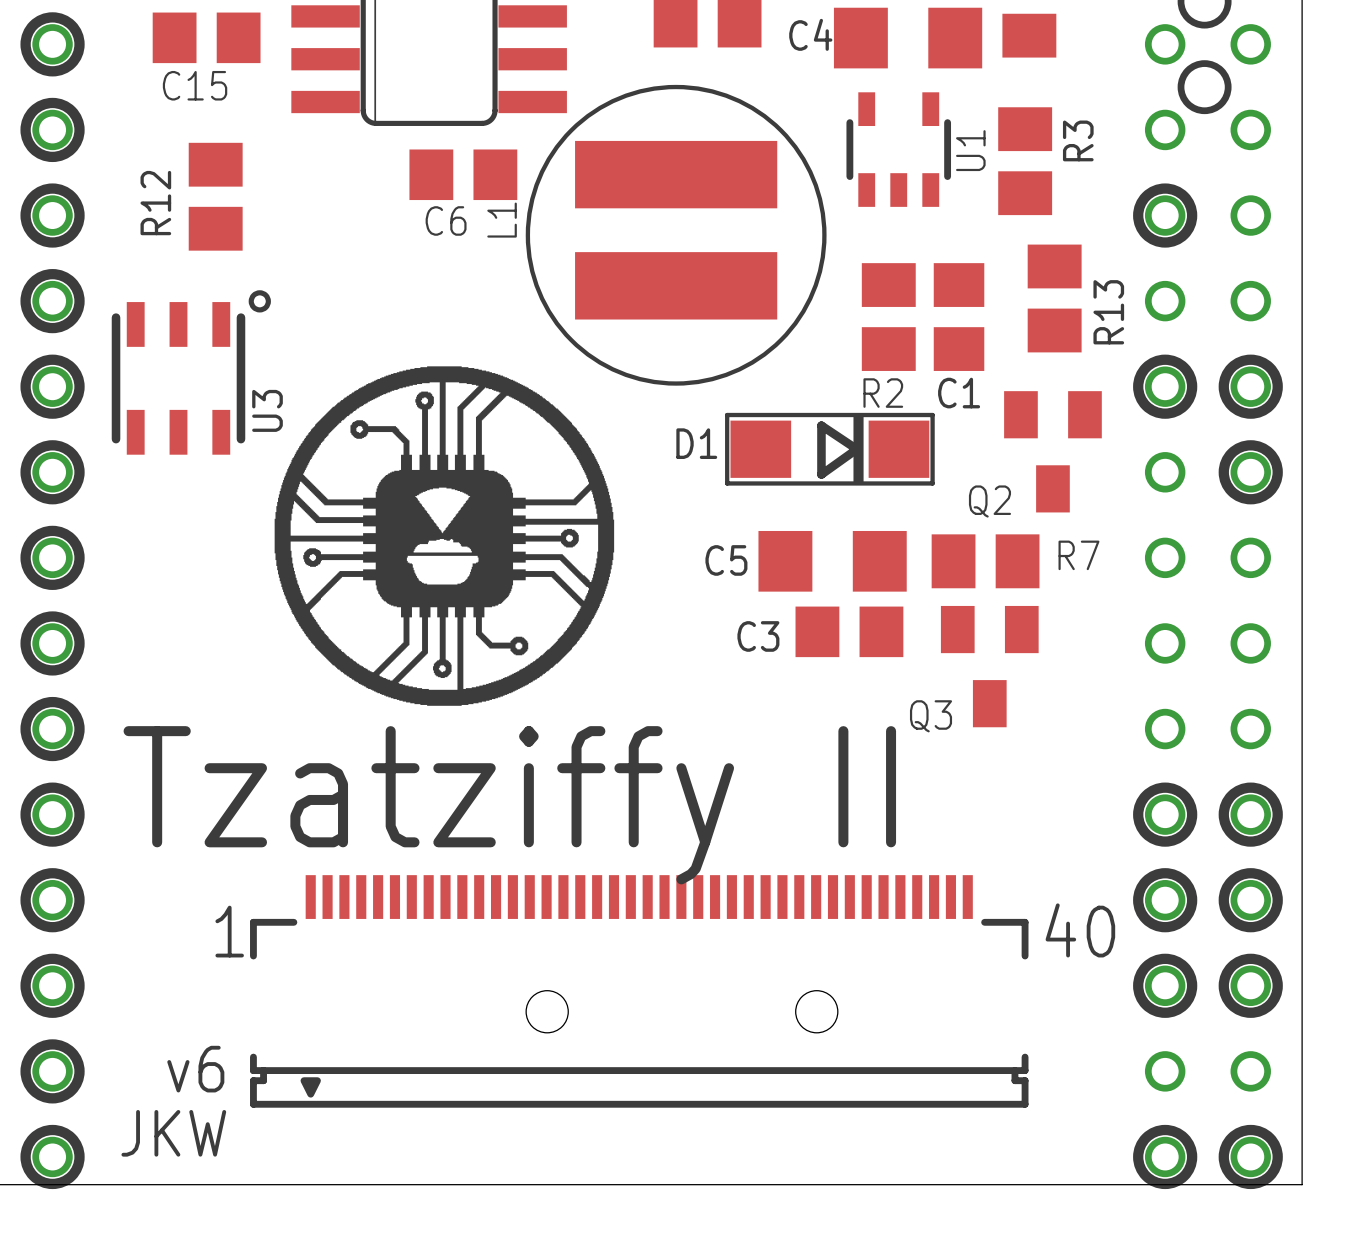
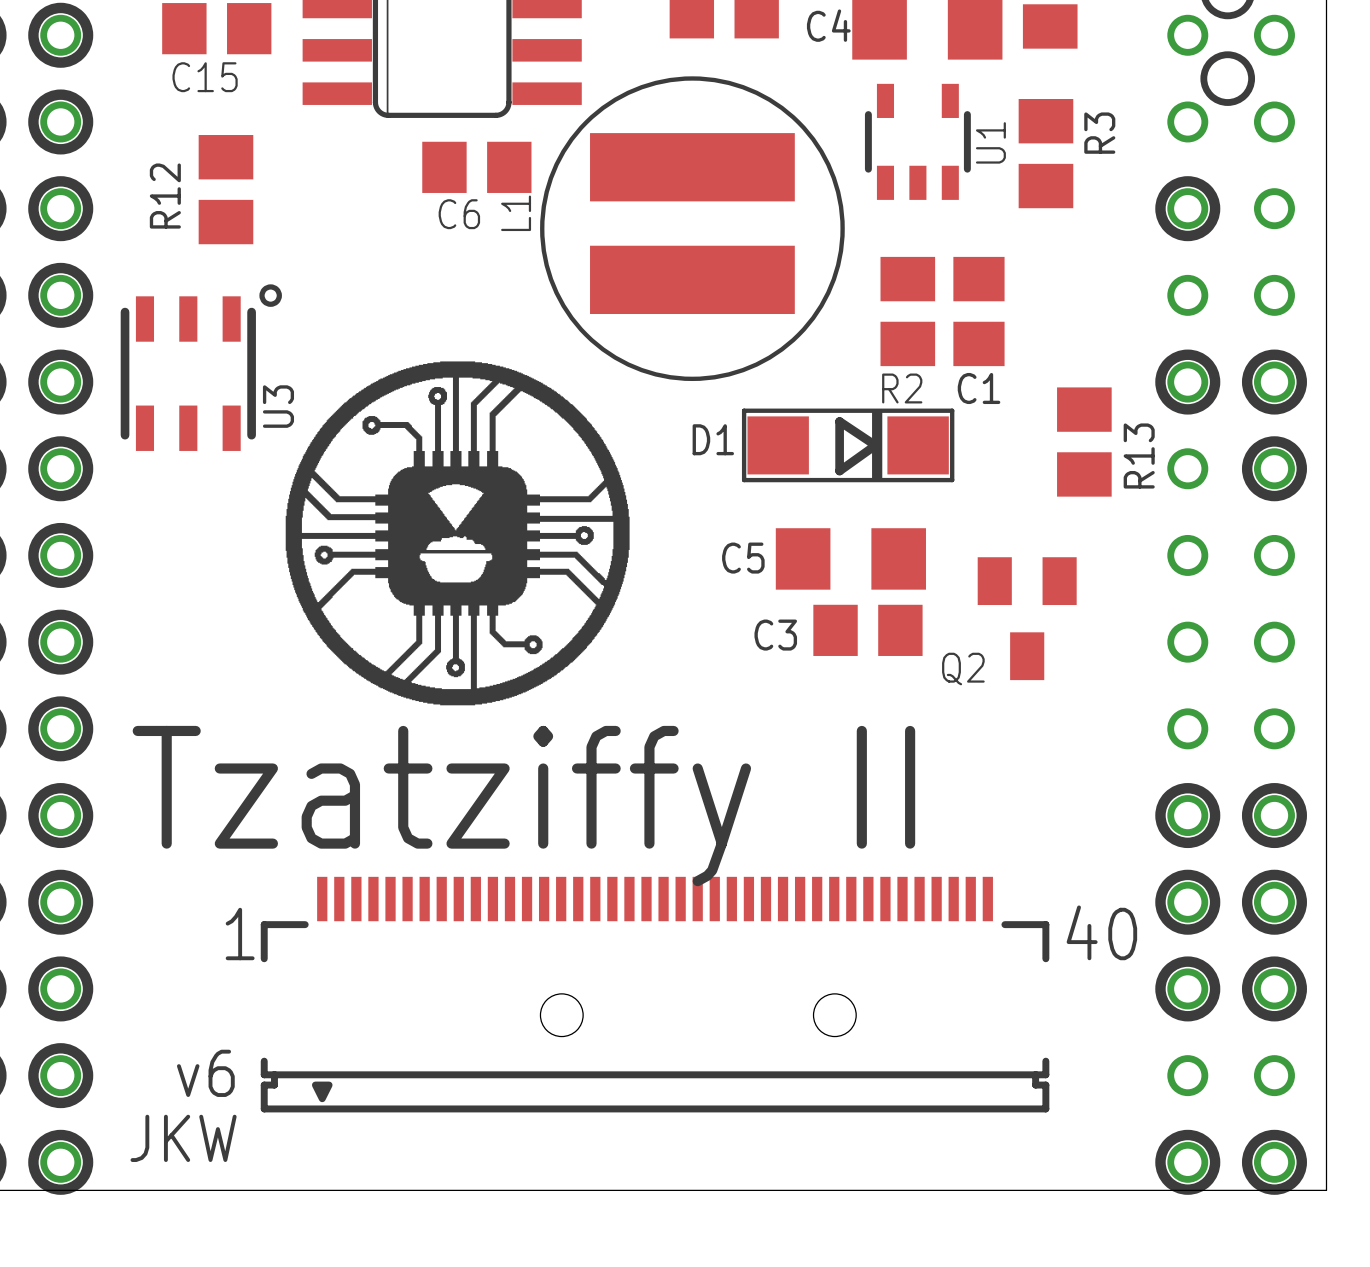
R13 position: (1054, 298) -> (1084, 442)
Q2 position: (1052, 451) -> (1027, 618)
R7: (985, 561) -> none
Q3: (989, 666) -> none

